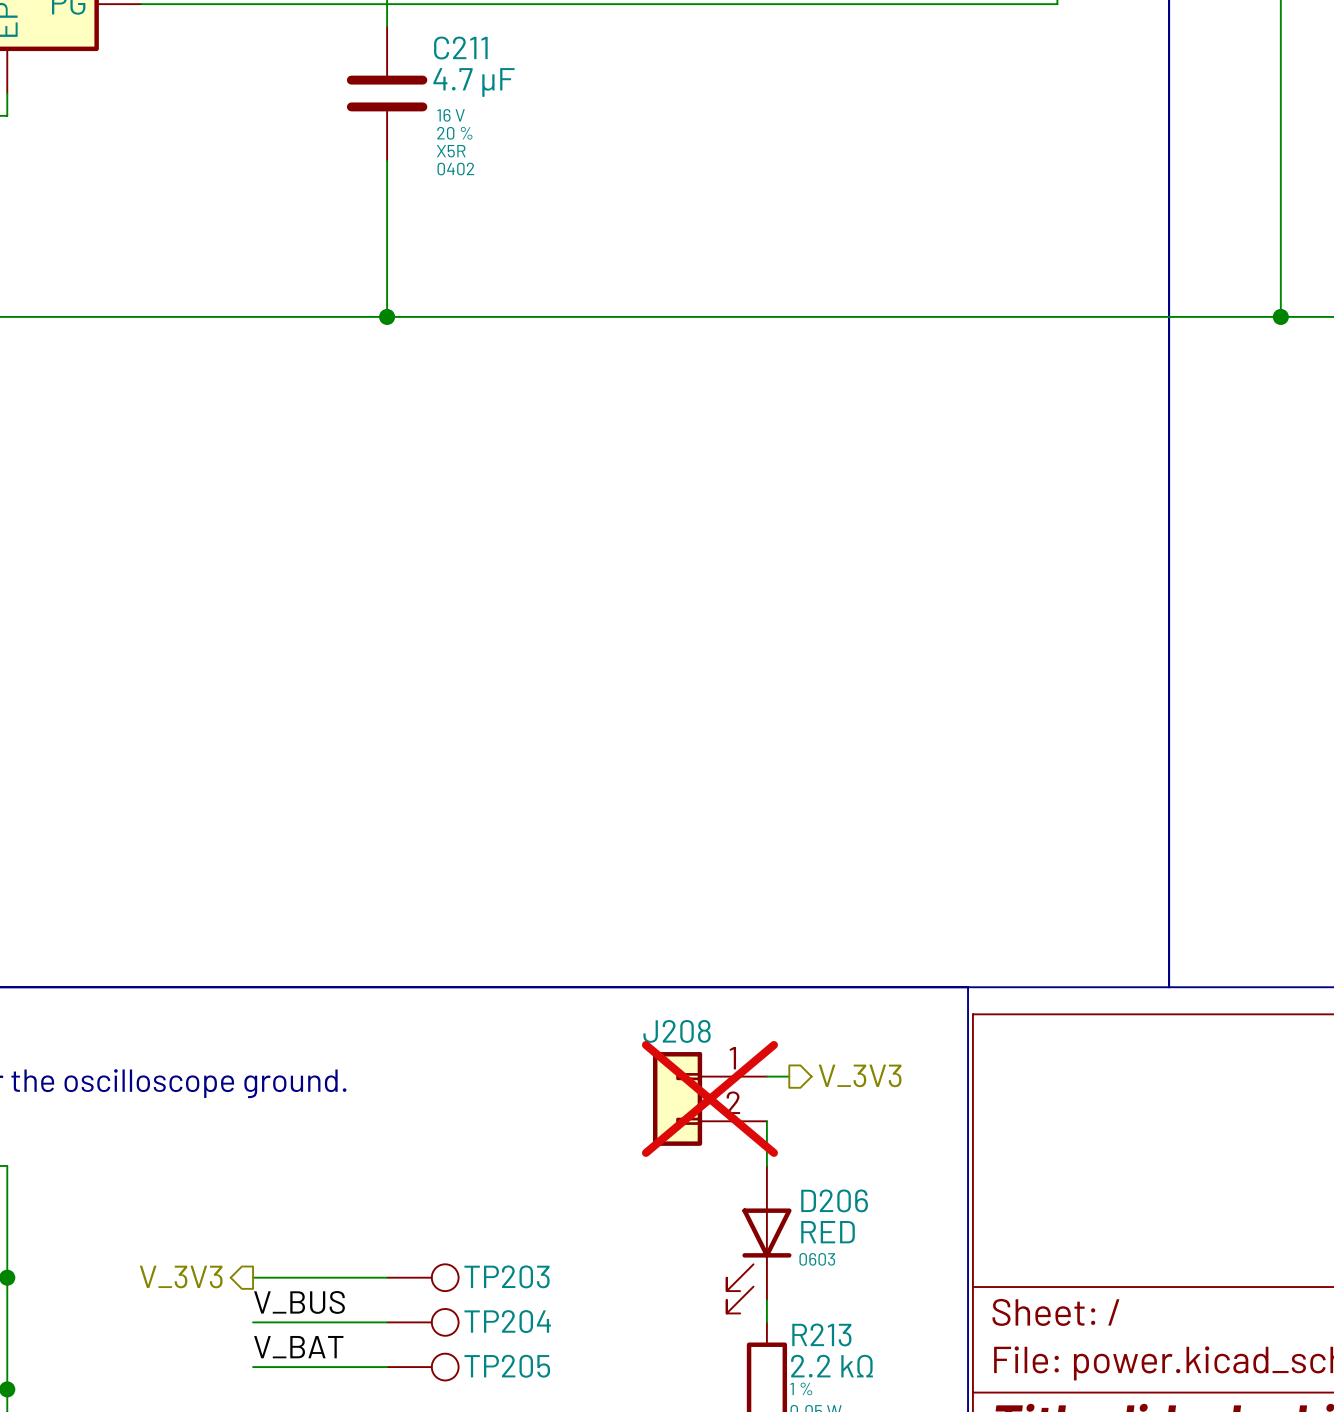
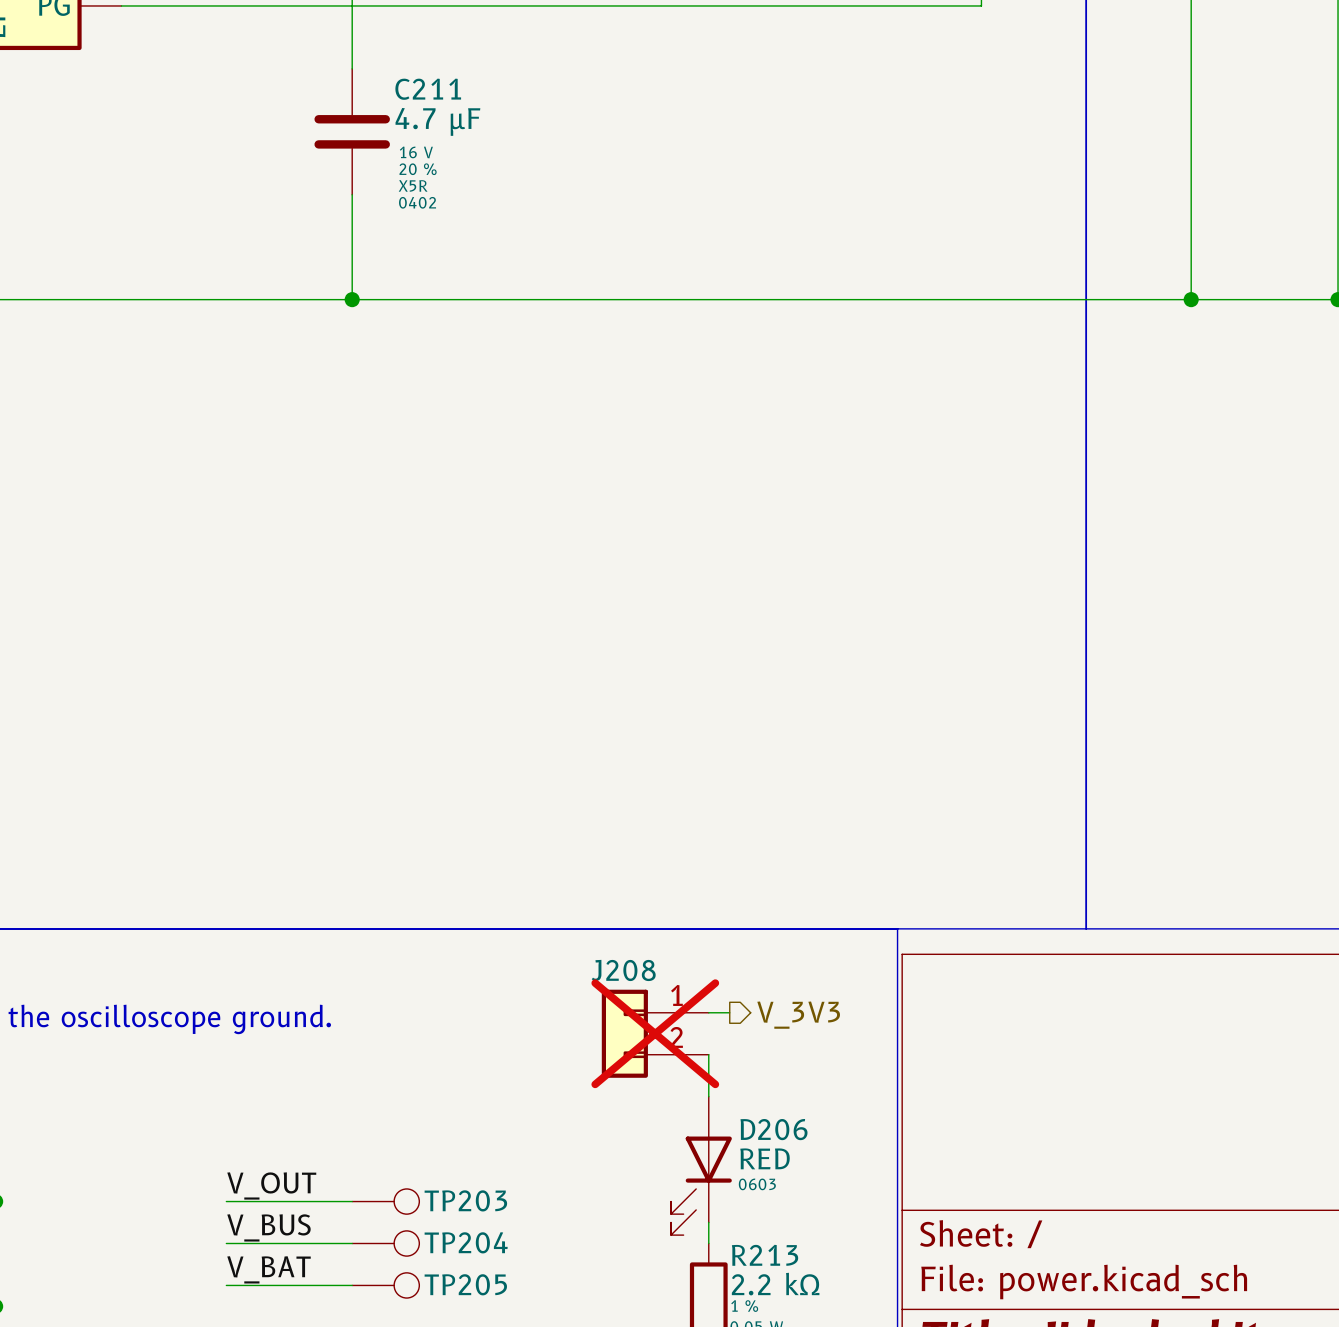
C211 position: (387, 93) -> (352, 131)
label: none -> V_OUT (271, 1185)
hierarchical label: V_3V3 (181, 1276) -> none

